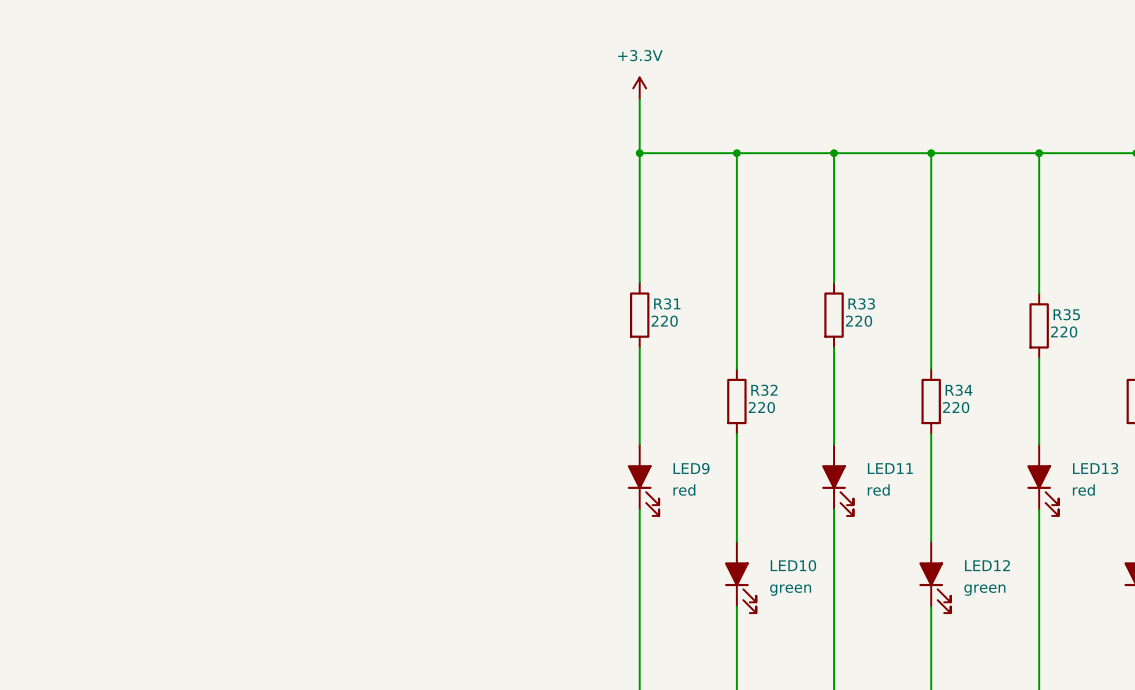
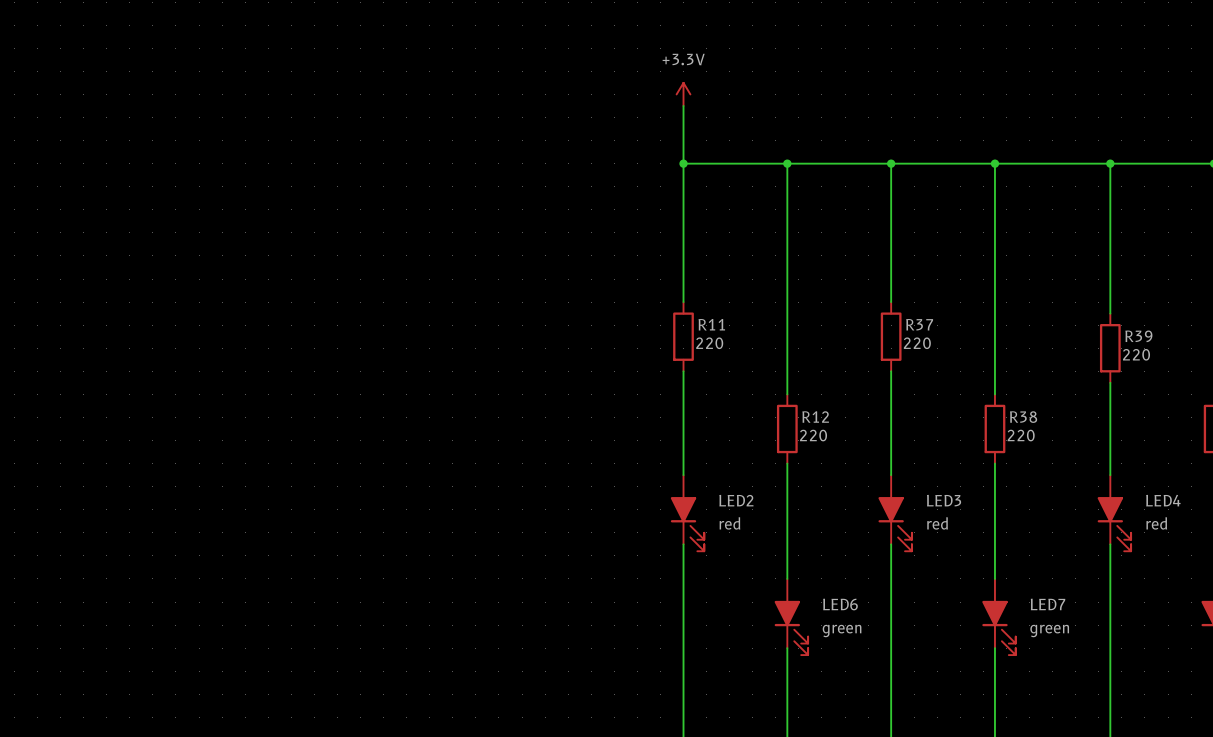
R31 name: R31 (667, 303) -> R11 (711, 324)
R33 name: R33 (861, 303) -> R37 (919, 324)
R35 name: R35 (1066, 314) -> R39 (1138, 336)
R32 name: R32 (764, 390) -> R12 (815, 417)
R34 name: R34 (959, 390) -> R38 (1023, 417)
LED9 name: LED9 (691, 468) -> LED2 (736, 500)
LED11 name: LED11 (890, 468) -> LED3 (944, 500)
LED13 name: LED13 (1095, 468) -> LED4 (1163, 500)
LED10 name: LED10 (793, 565) -> LED6 (840, 604)
LED12 name: LED12 (987, 565) -> LED7 (1048, 604)

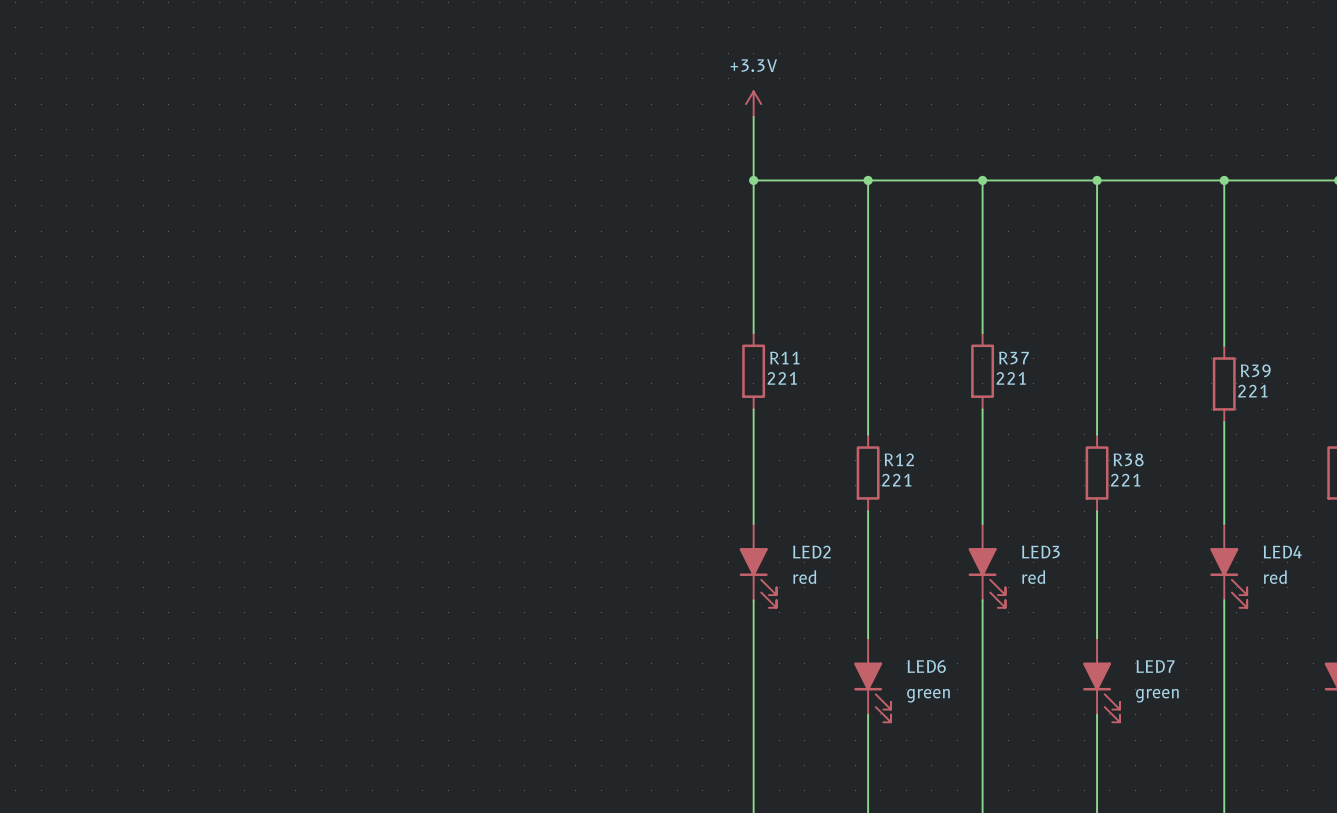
R11 value: 220 (709, 343) -> 221 (782, 378)
R37 value: 220 (917, 343) -> 221 (1011, 378)
R39 value: 220 (1136, 354) -> 221 (1252, 391)
R12 value: 220 (813, 435) -> 221 (896, 480)
R38 value: 220 (1021, 435) -> 221 (1125, 480)

